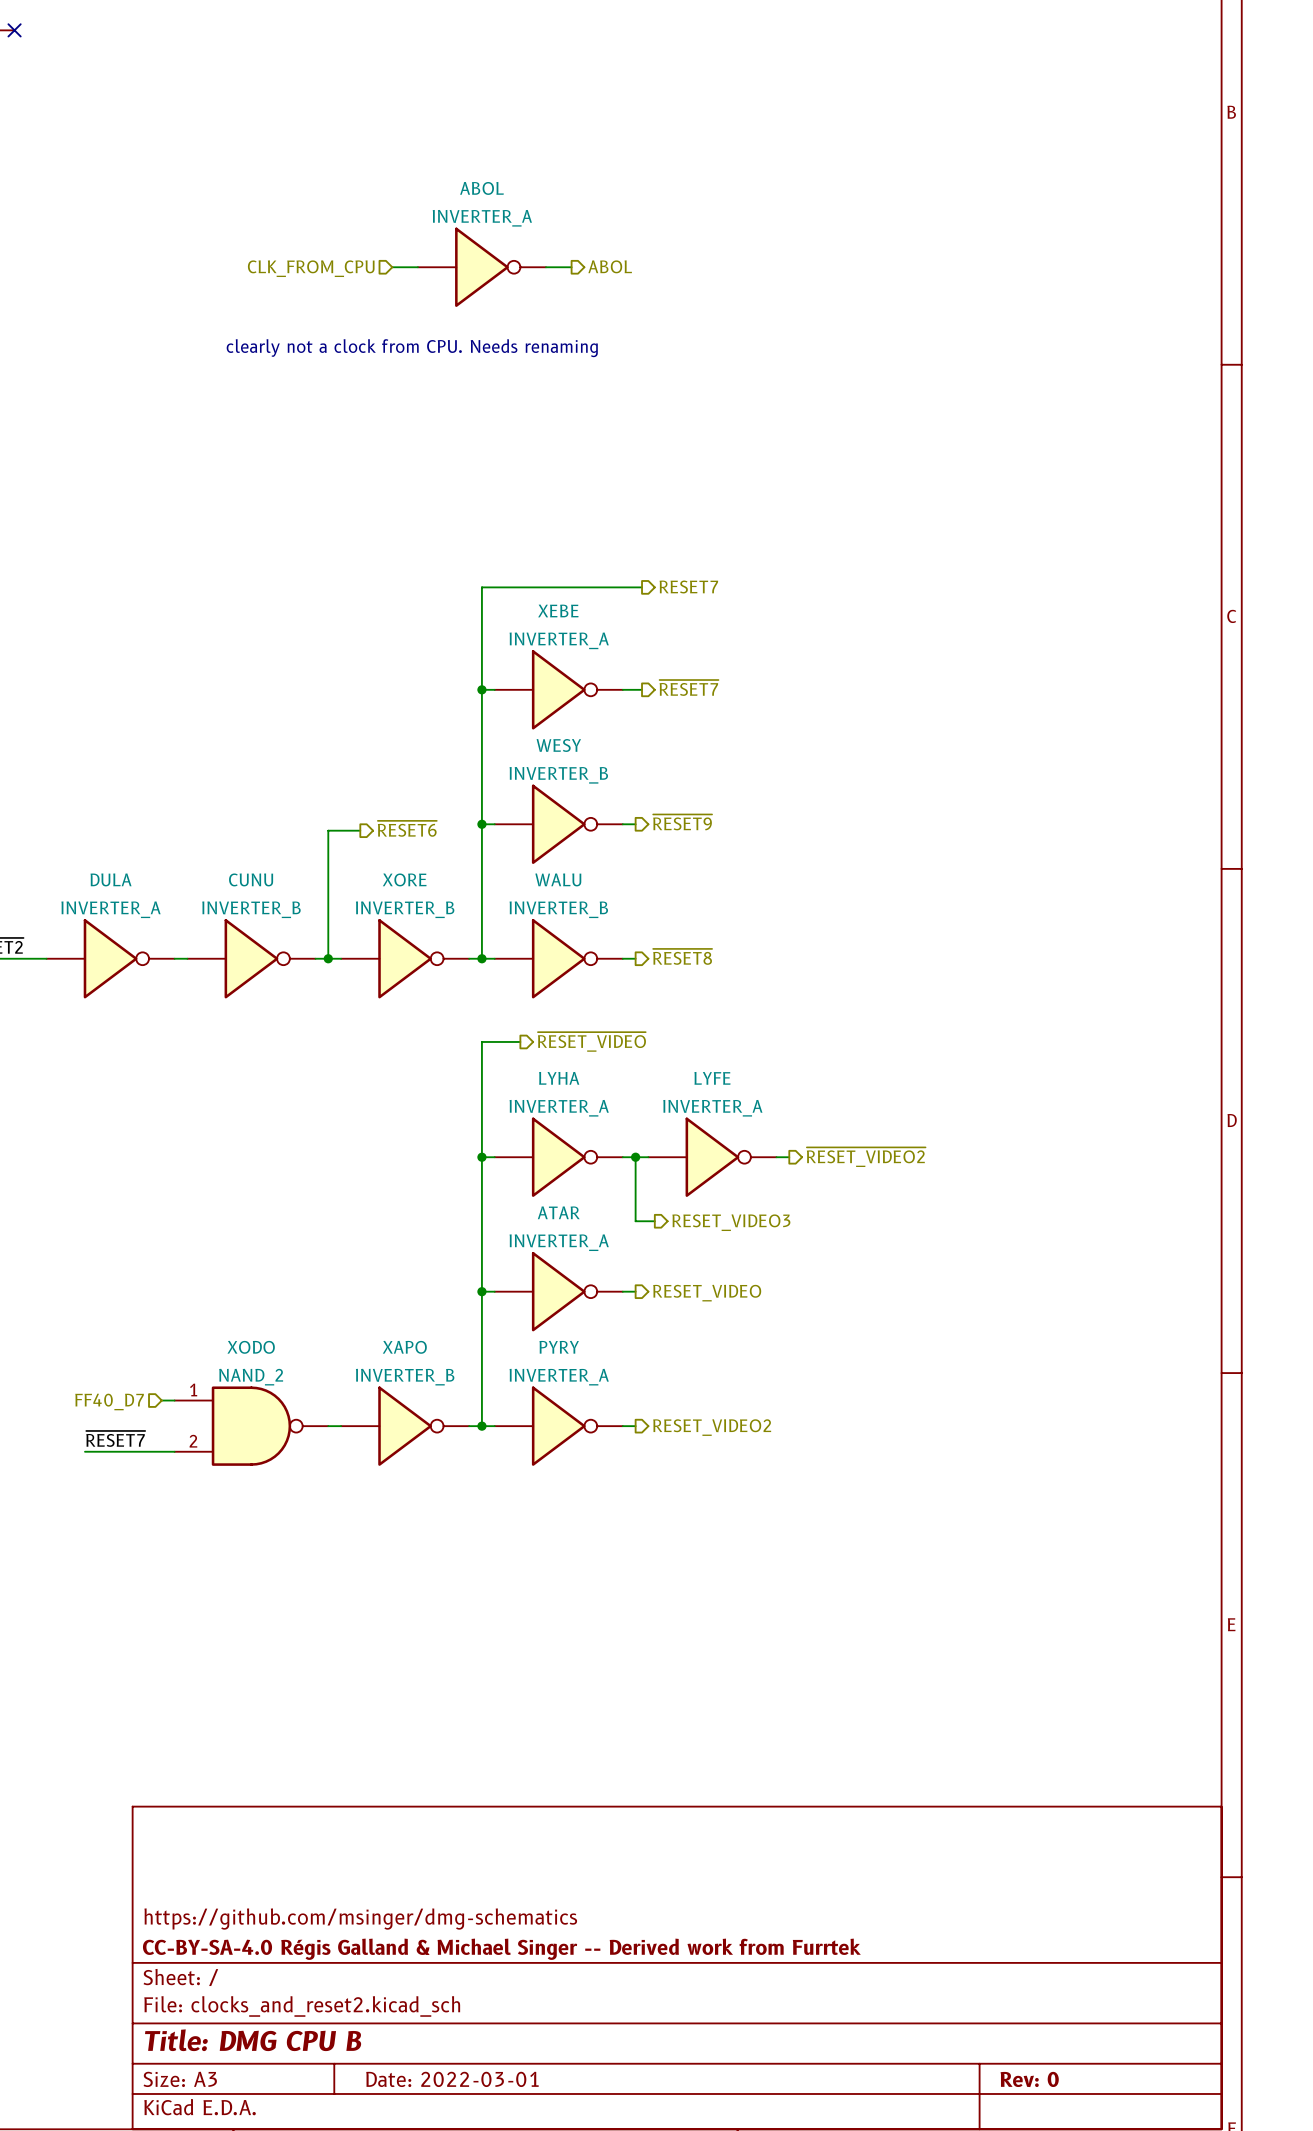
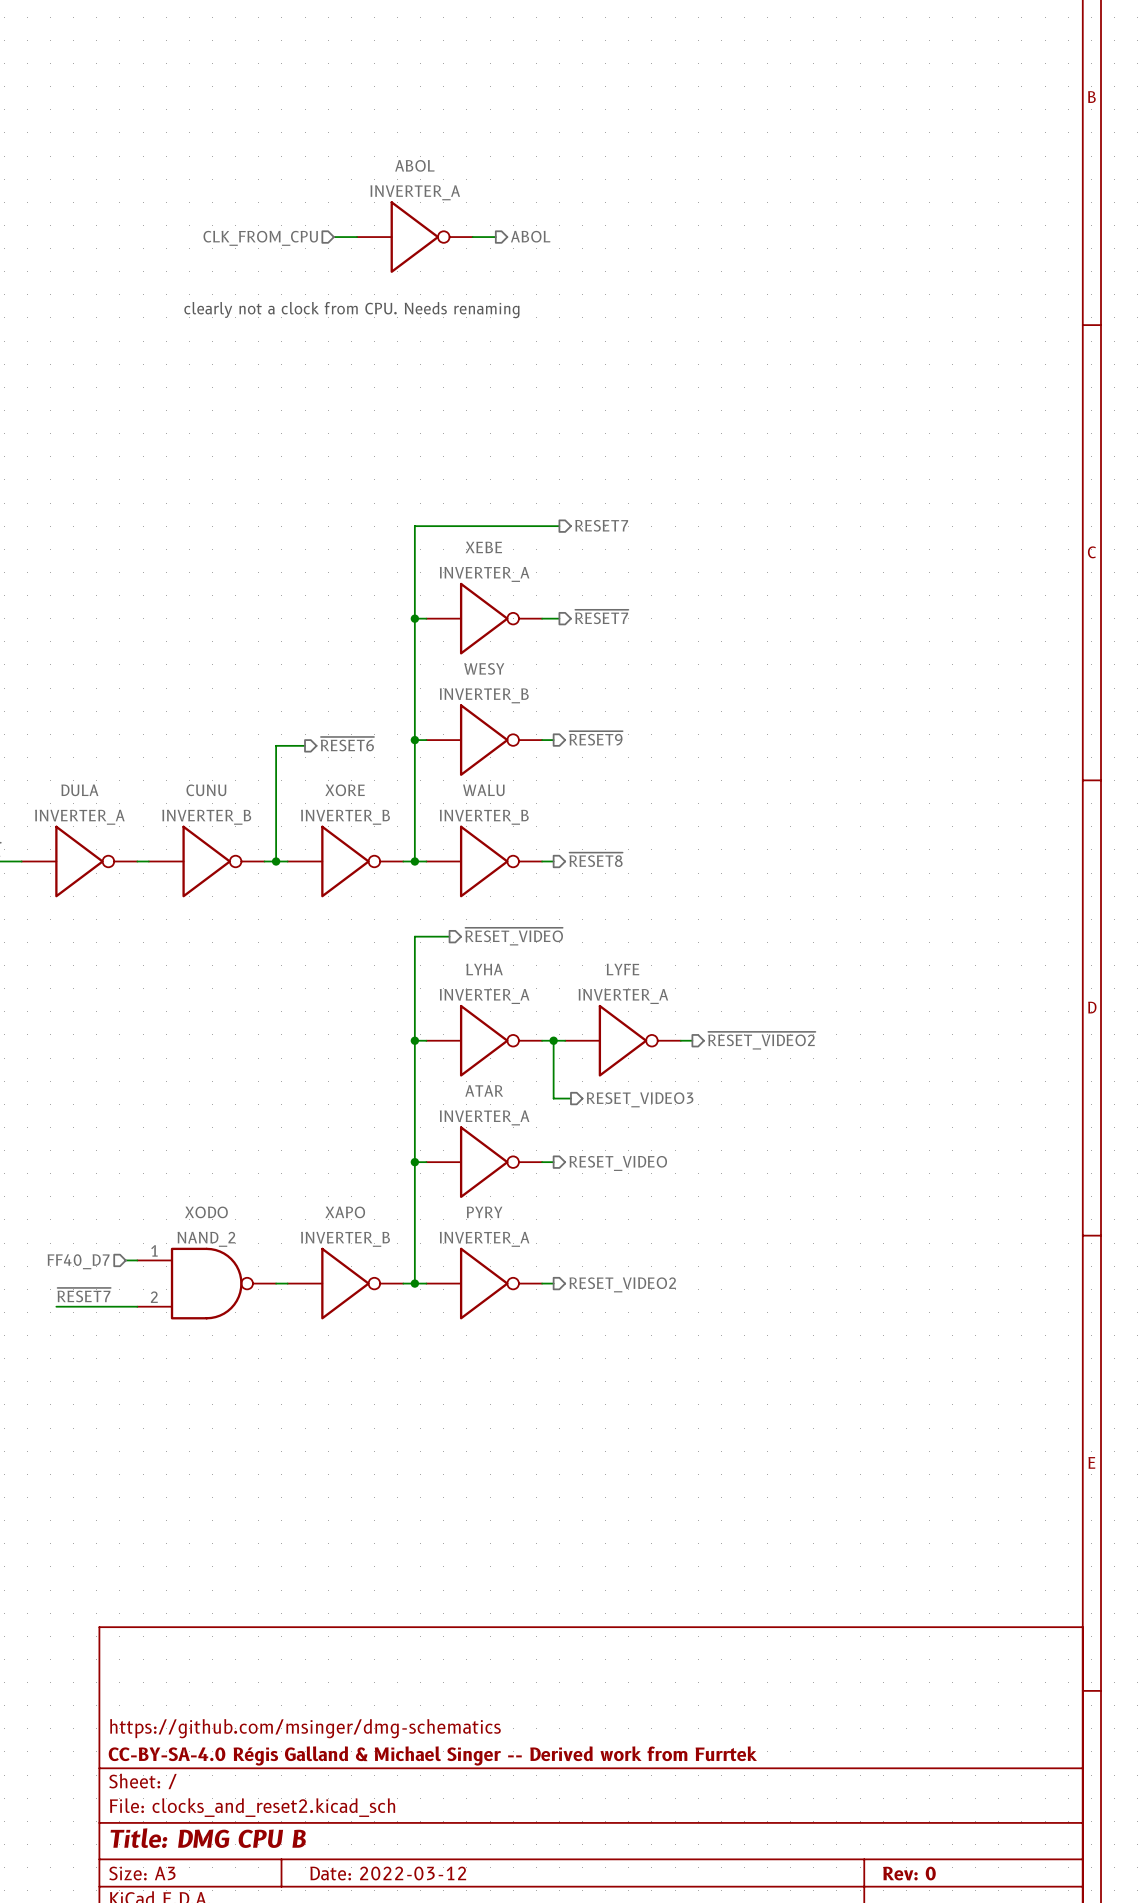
title block: Date: 2022-03-01 (452, 2079) -> Date: 2022-03-12 (388, 1873)

